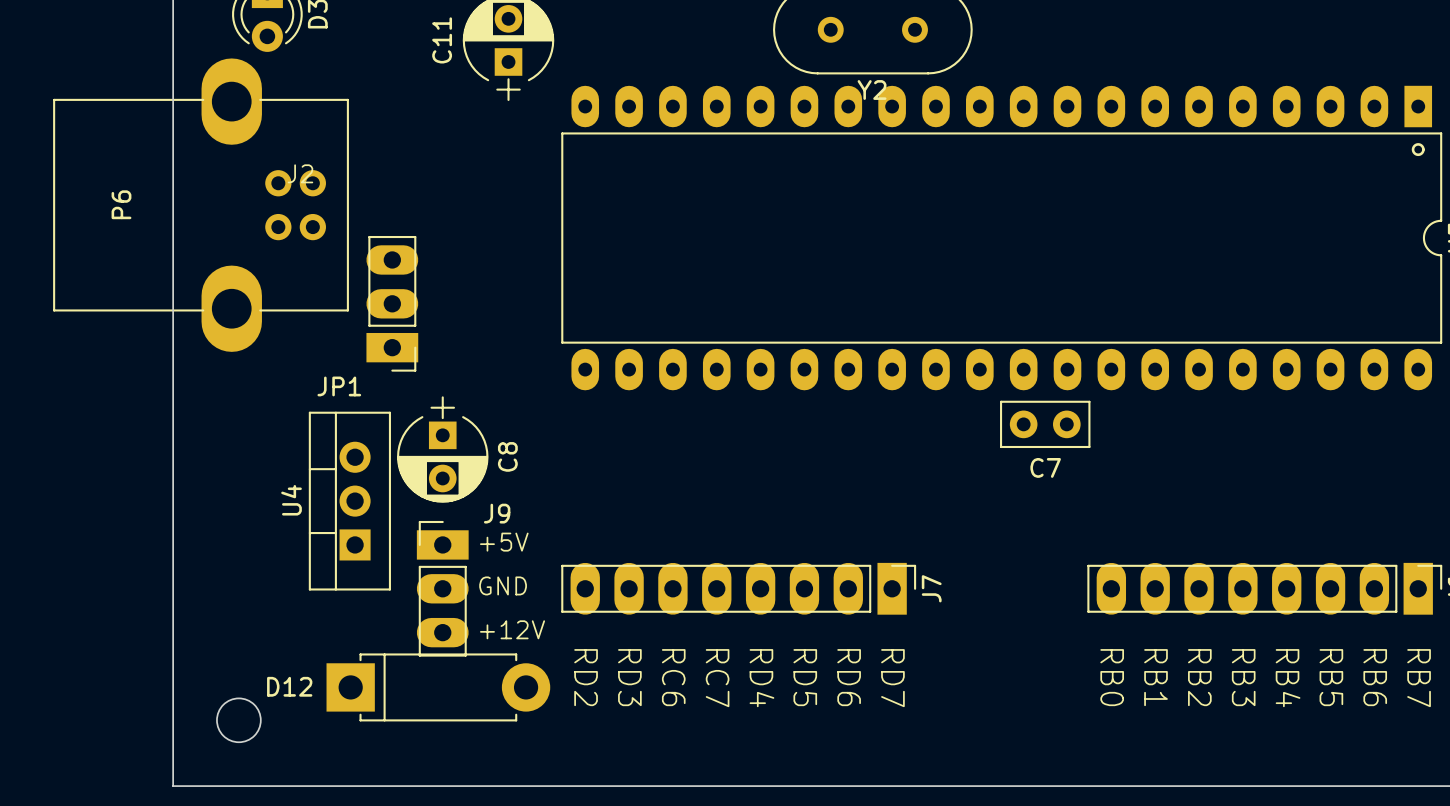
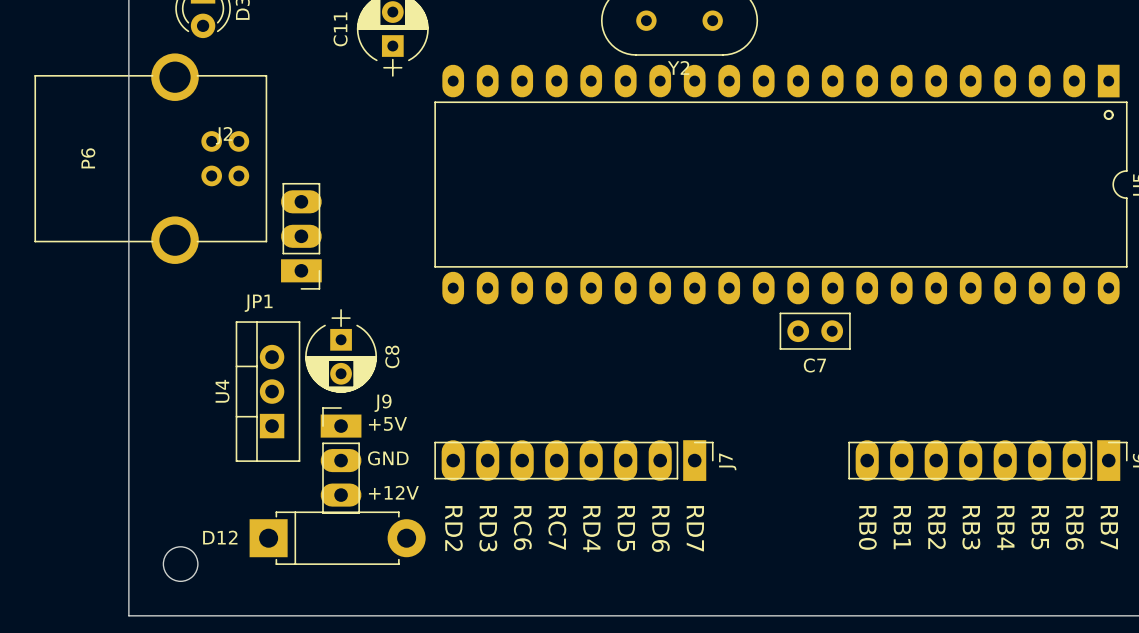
P6 footprint: [53, 58, 349, 352] -> [34, 53, 268, 264]

